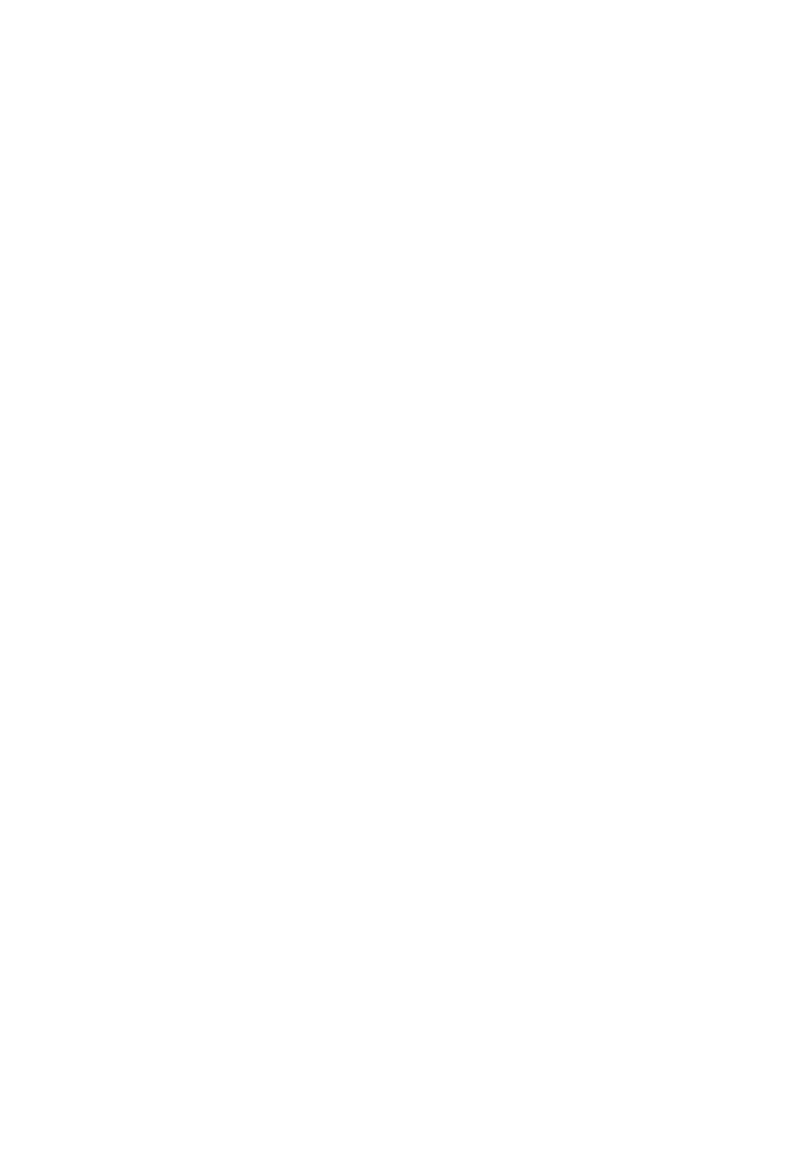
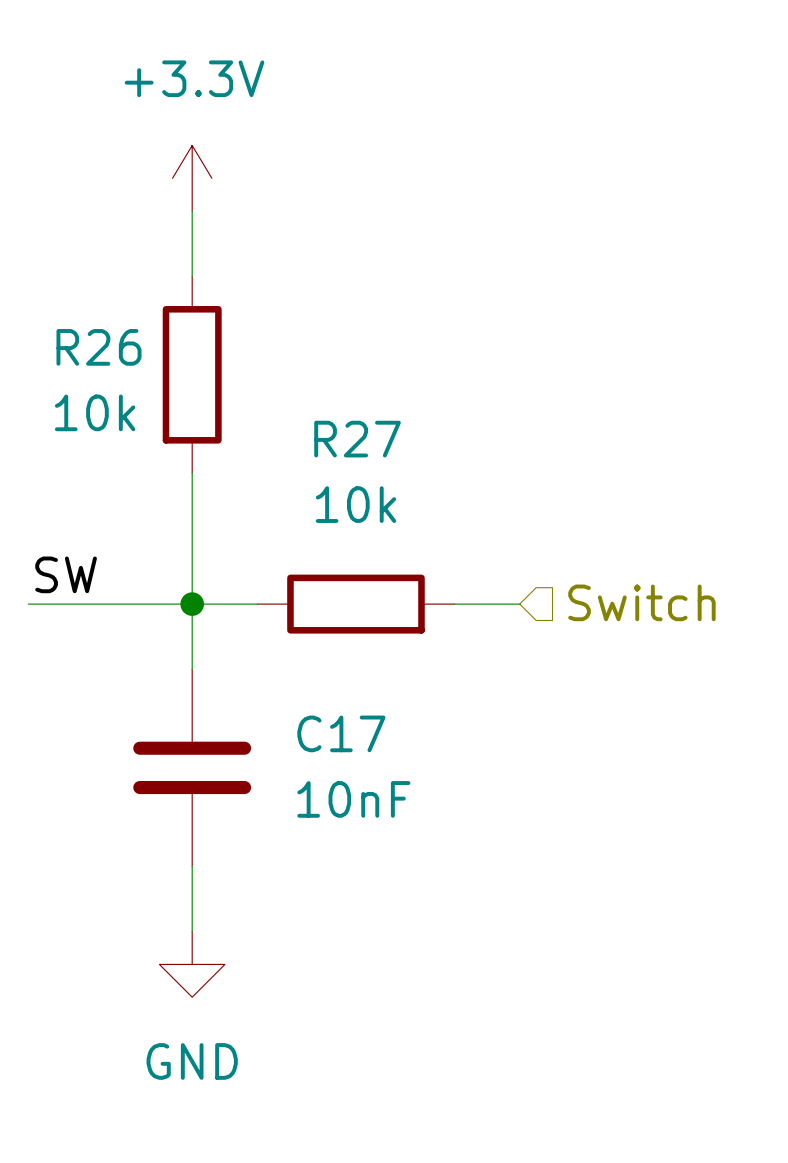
power symbol: none -> +3.3V (192, 178)
wire: none -> (192, 211) (192, 276)
R26: none -> 10k (192, 374)
wire: none -> (192, 473) (192, 669)
label: none -> SW (66, 574)
hierarchical label: none -> Switch (641, 602)
wire: none -> (28, 604) (257, 604)
junction: none -> (192, 604)
R27: none -> 10k (355, 604)
wire: none -> (454, 604) (519, 604)
C17: none -> 10nF (192, 767)
wire: none -> (192, 866) (192, 931)
power symbol: none -> GND (192, 964)

